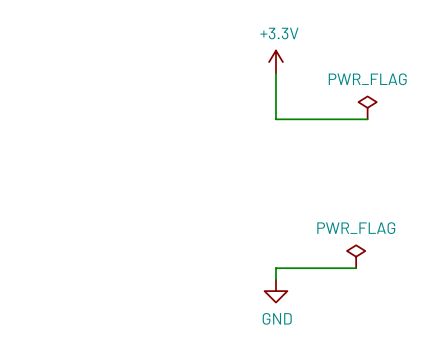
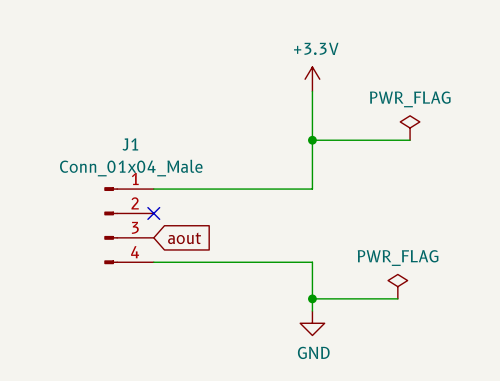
wire: none -> (312, 140) (312, 189) (153, 189)
junction: none -> (312, 140)
no-connect mark: none -> (153, 213)
J1: none -> Conn_01x04_Male (129, 225)
global label: none -> aout (184, 238)
wire: none -> (153, 262) (312, 262) (312, 298)
junction: none -> (312, 298)

